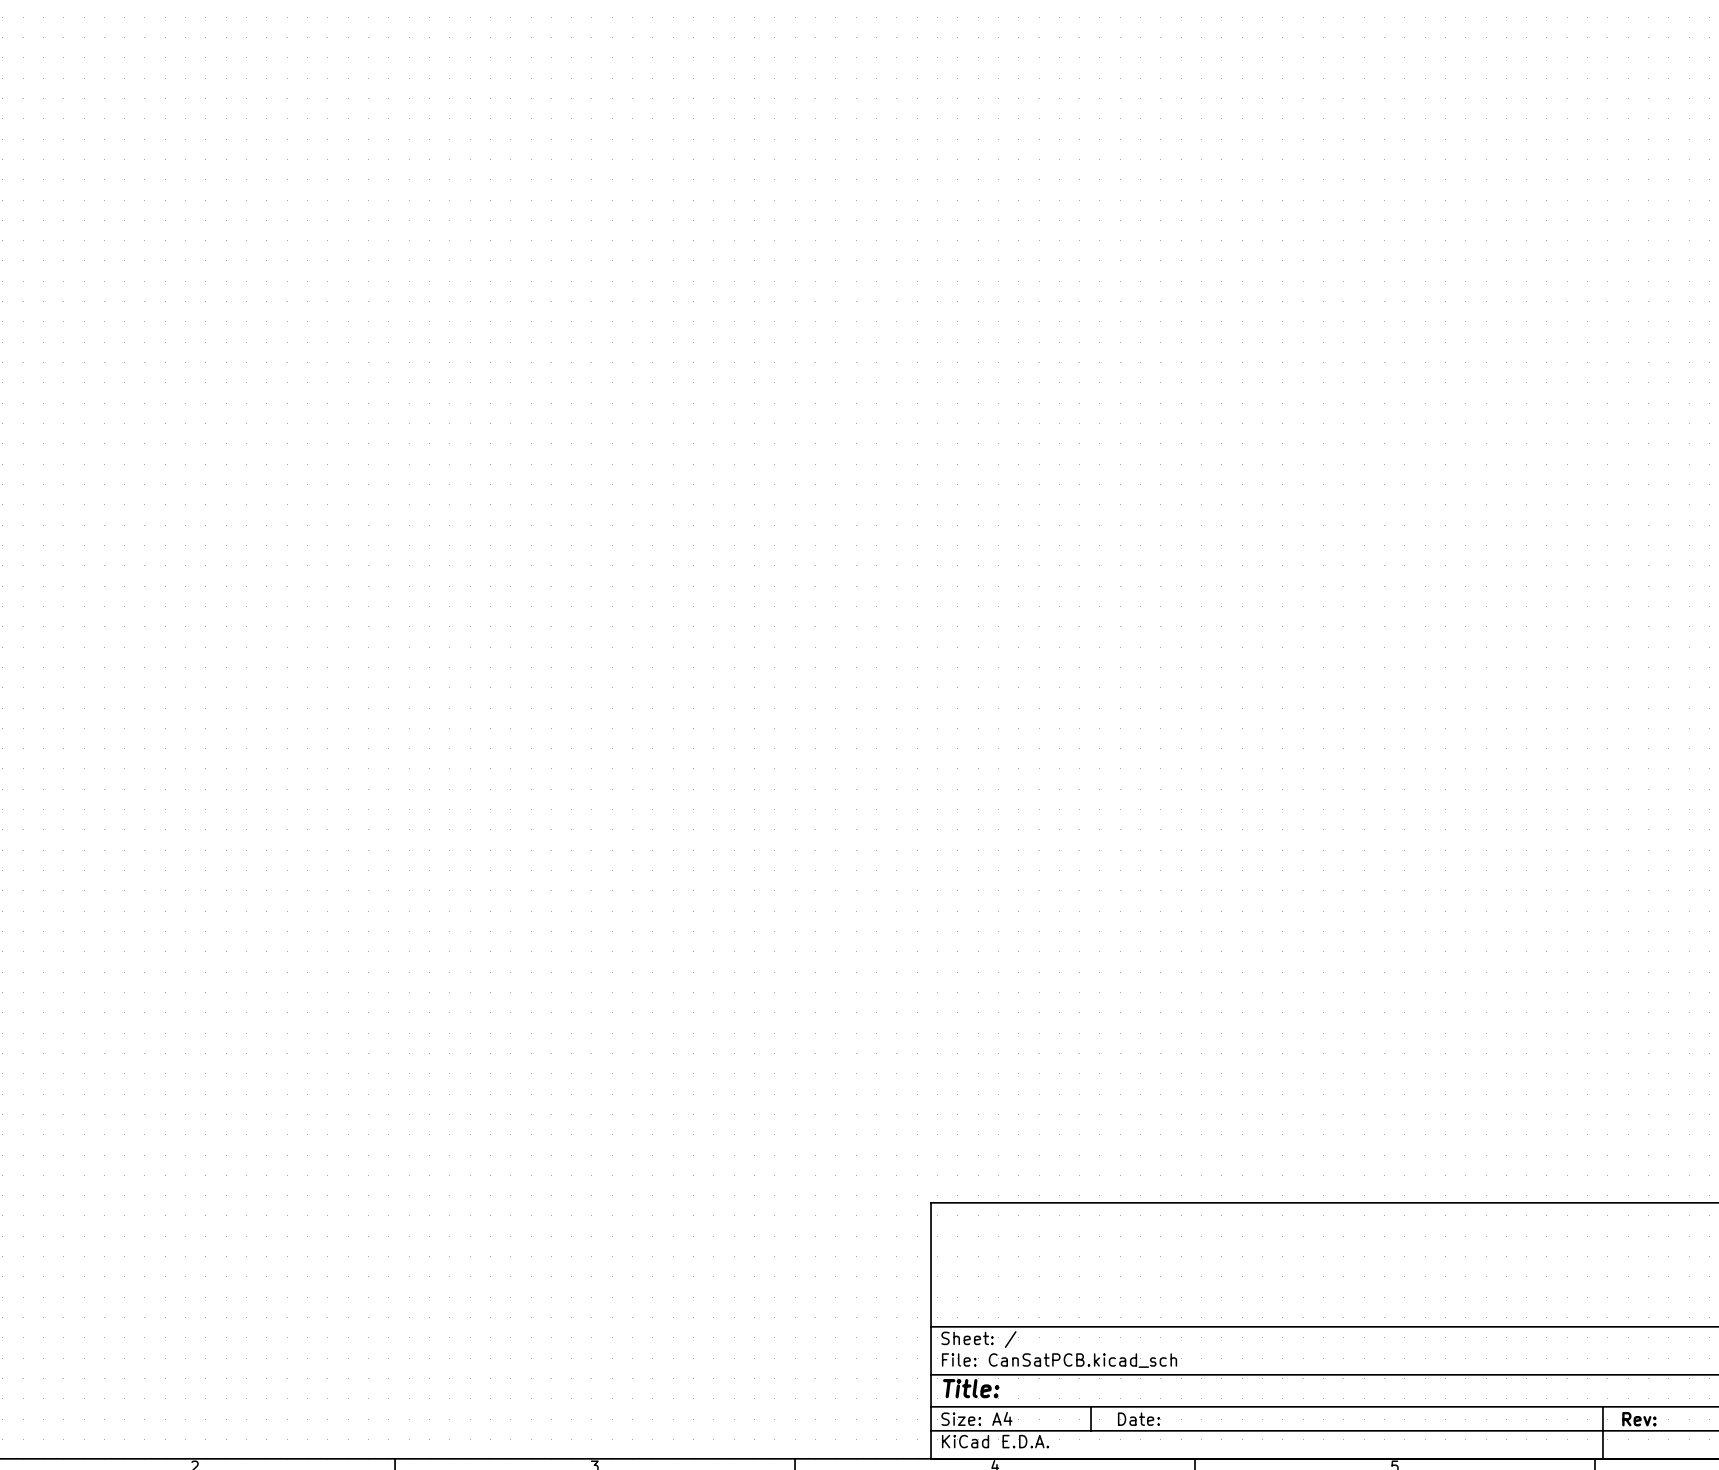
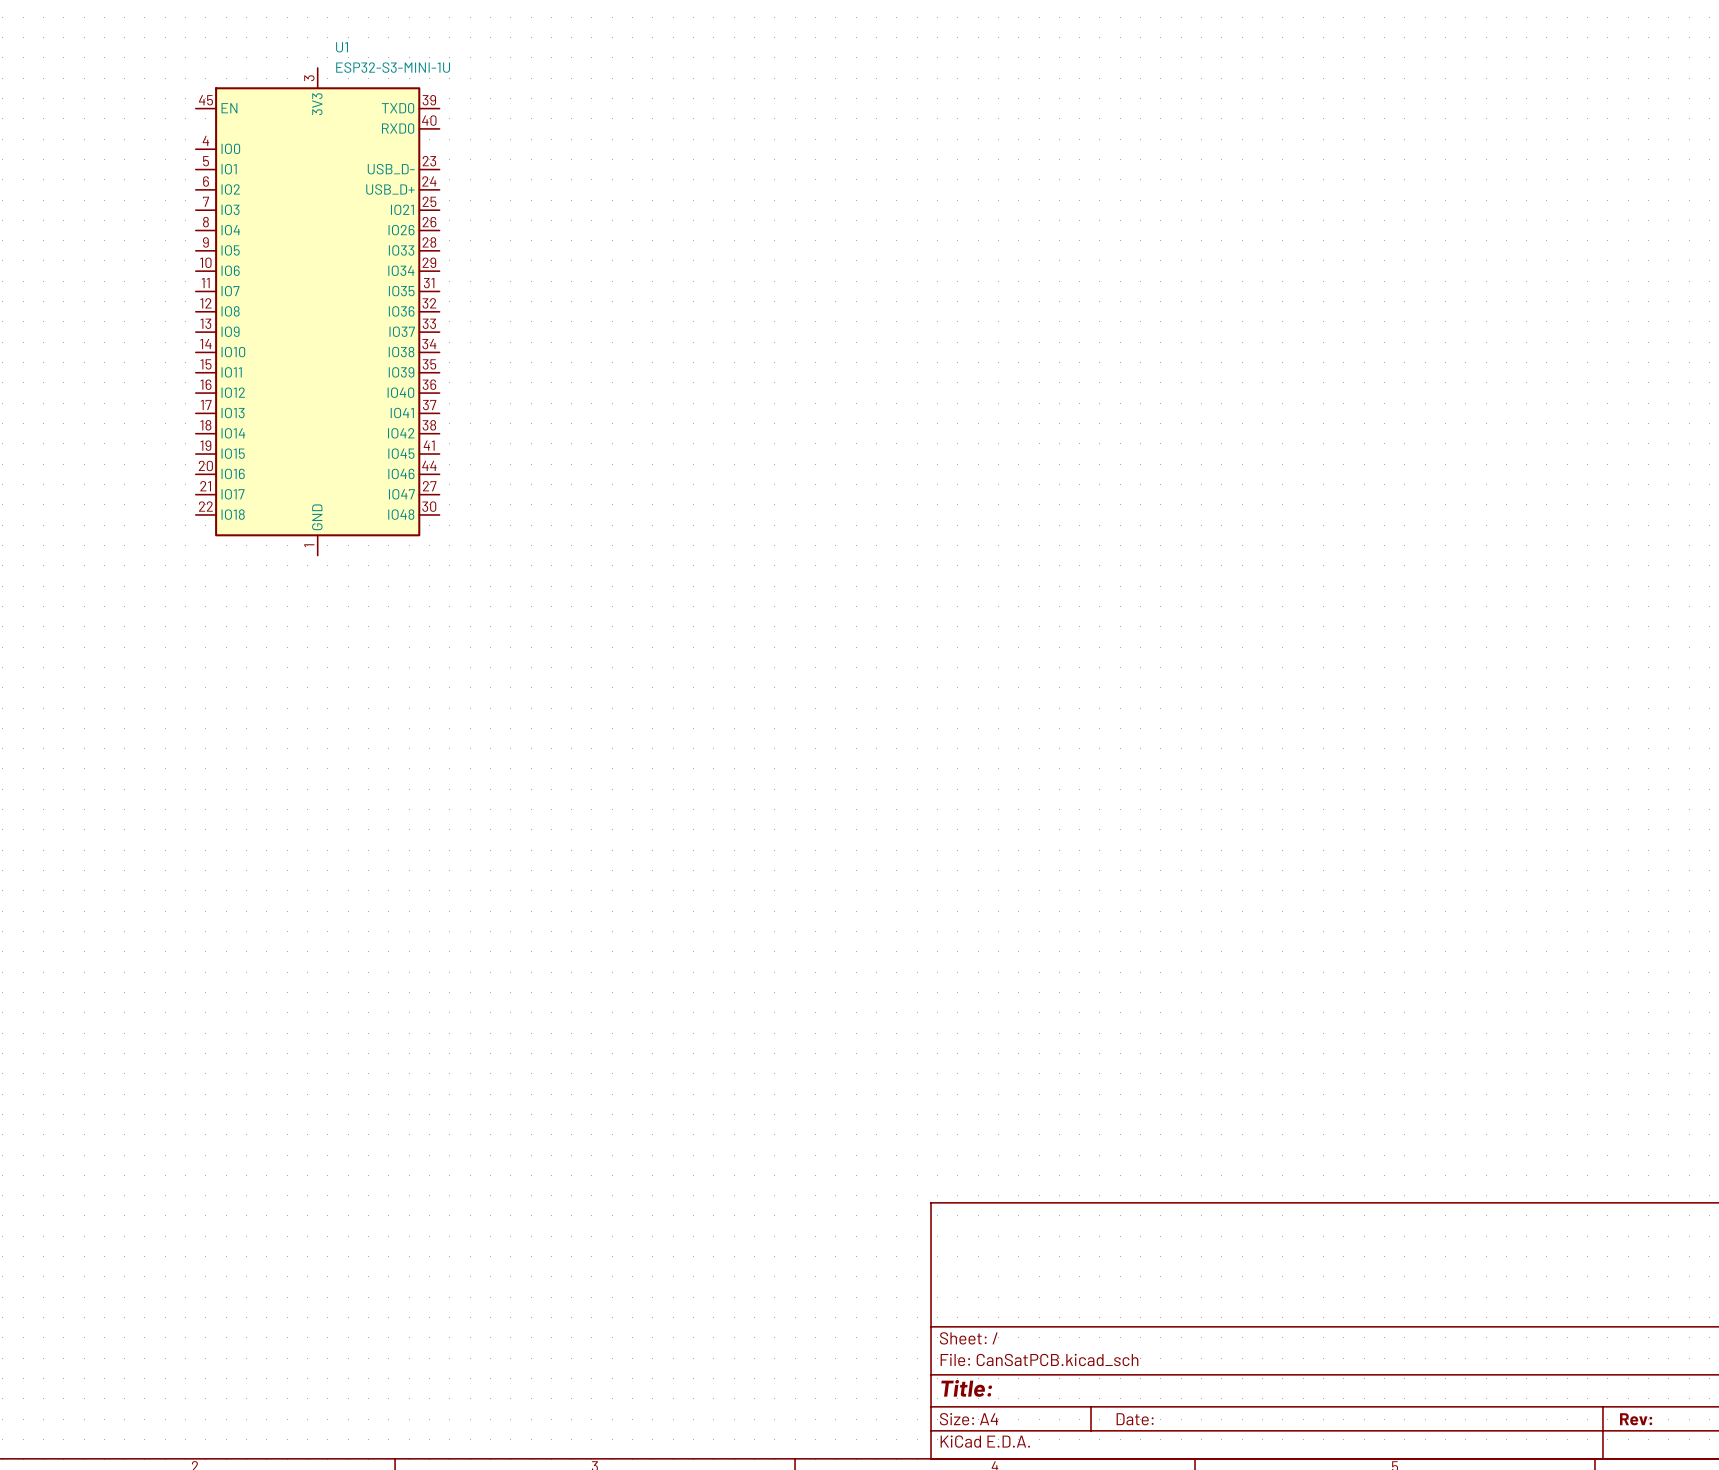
U1: none -> ESP32-S3-MINI-1U (317, 311)

